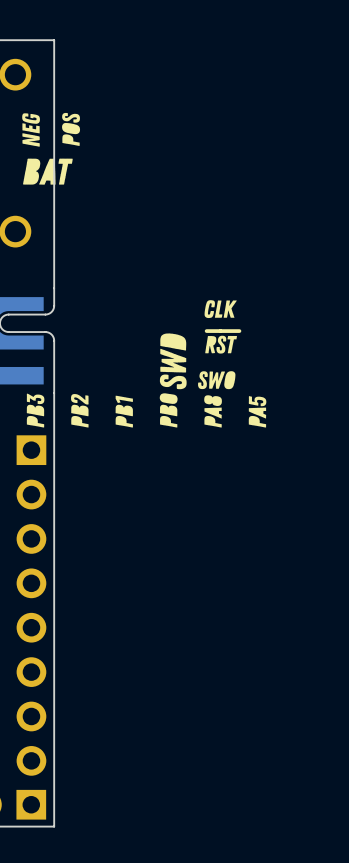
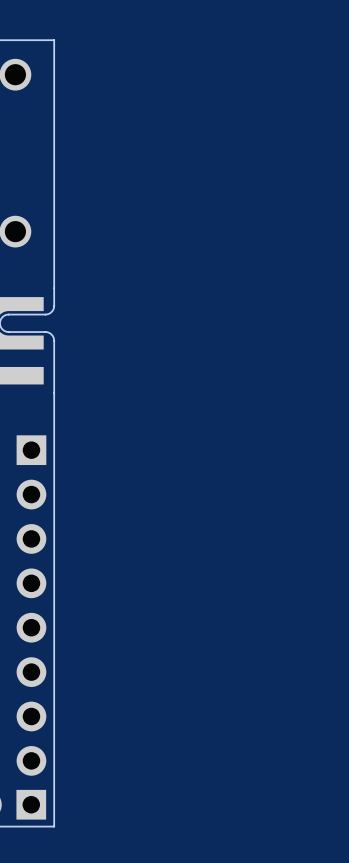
drawing: [22, 112, 81, 185] -> none
drawing: [159, 300, 267, 428] -> none
line: (239, 331) (206, 331) (239, 331) -> none
drawing: [26, 393, 45, 428] -> none
drawing: [71, 394, 89, 428] -> none
drawing: [115, 395, 133, 428] -> none

